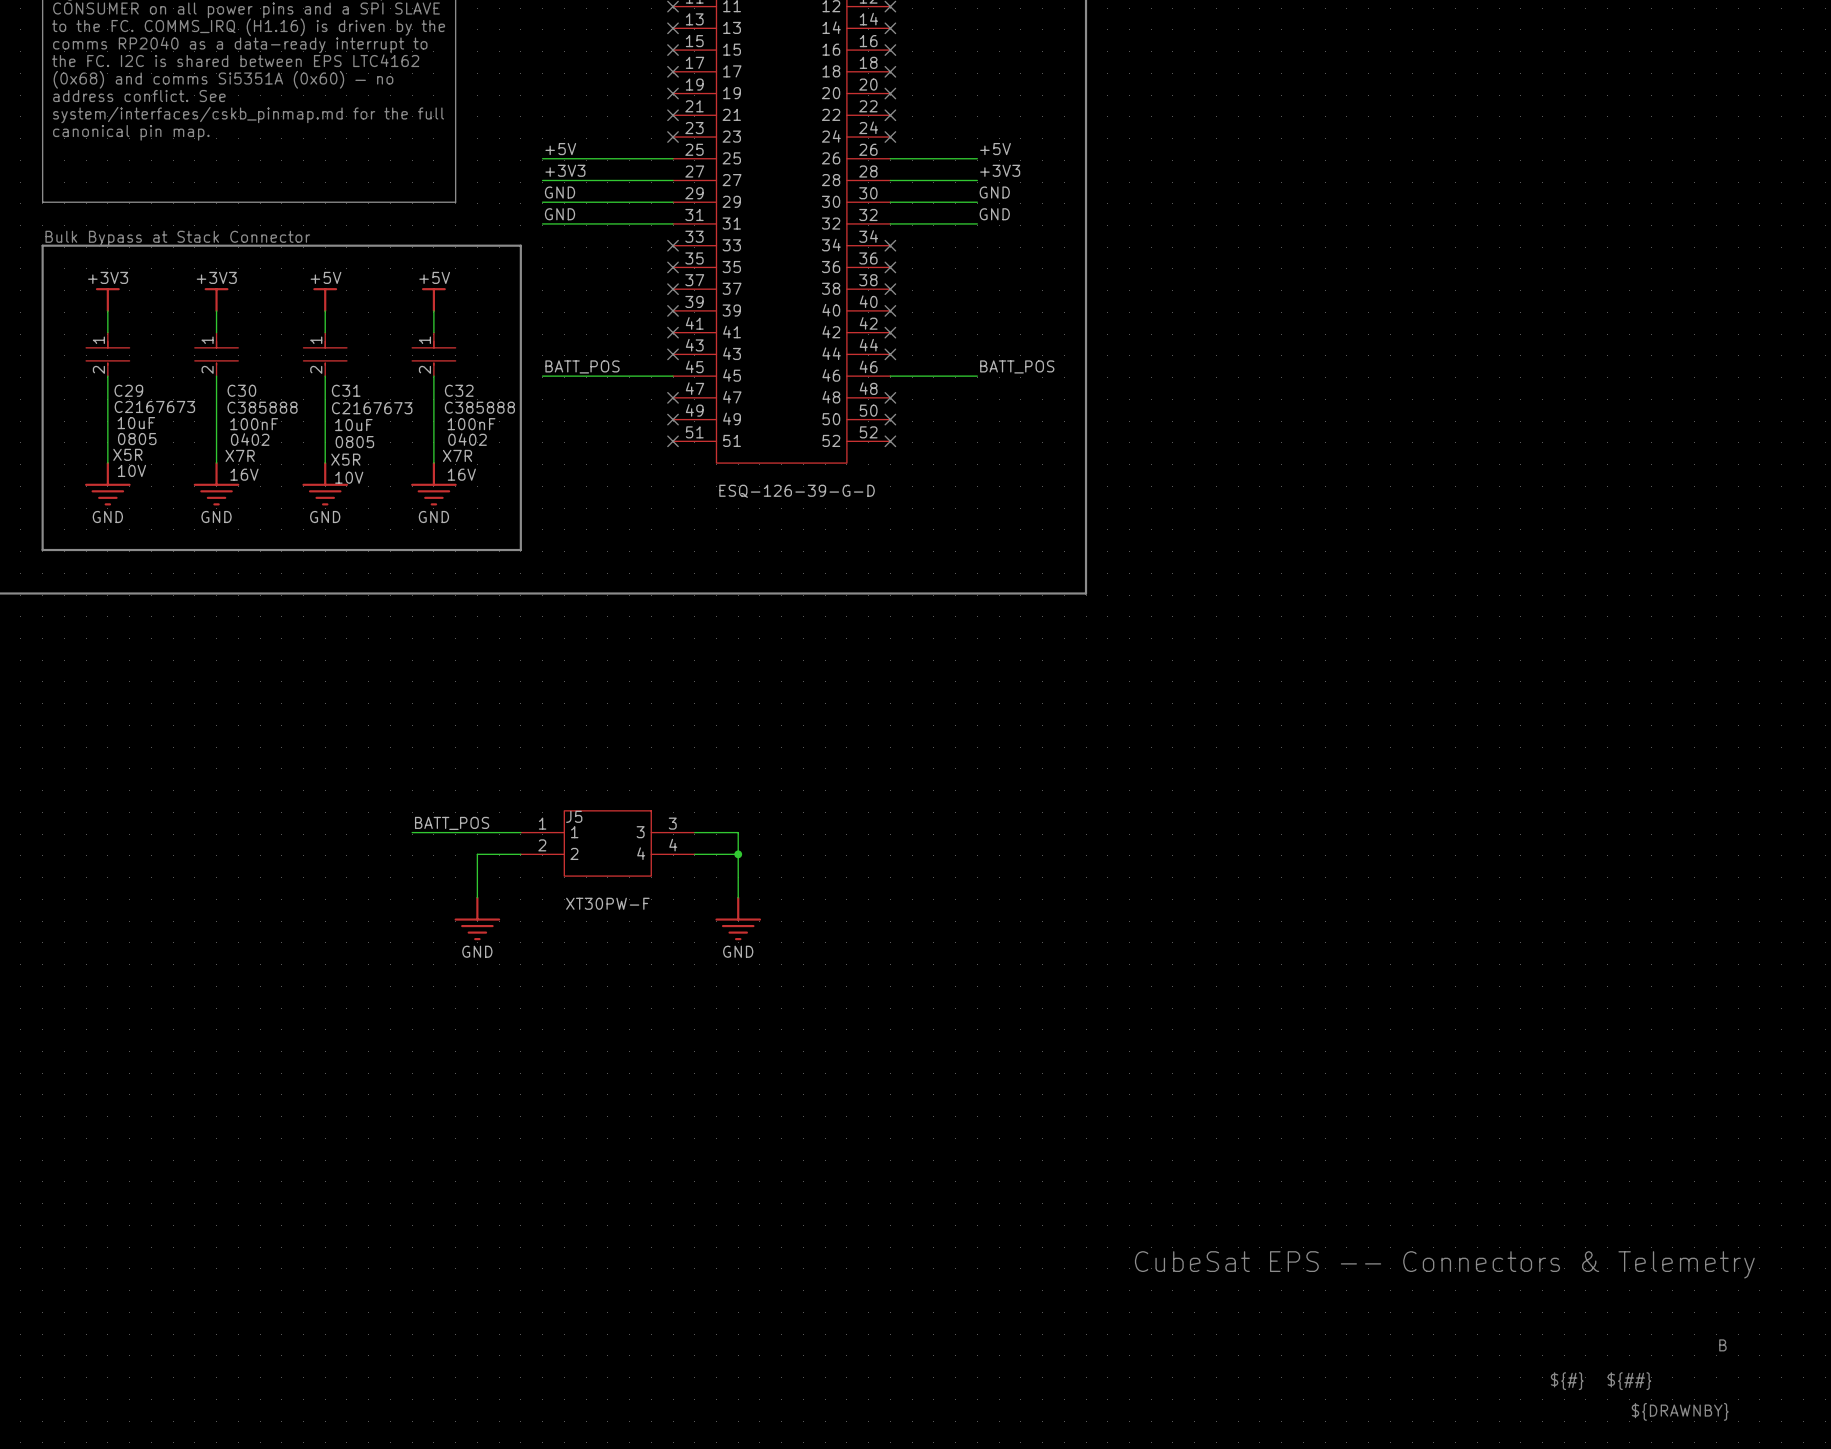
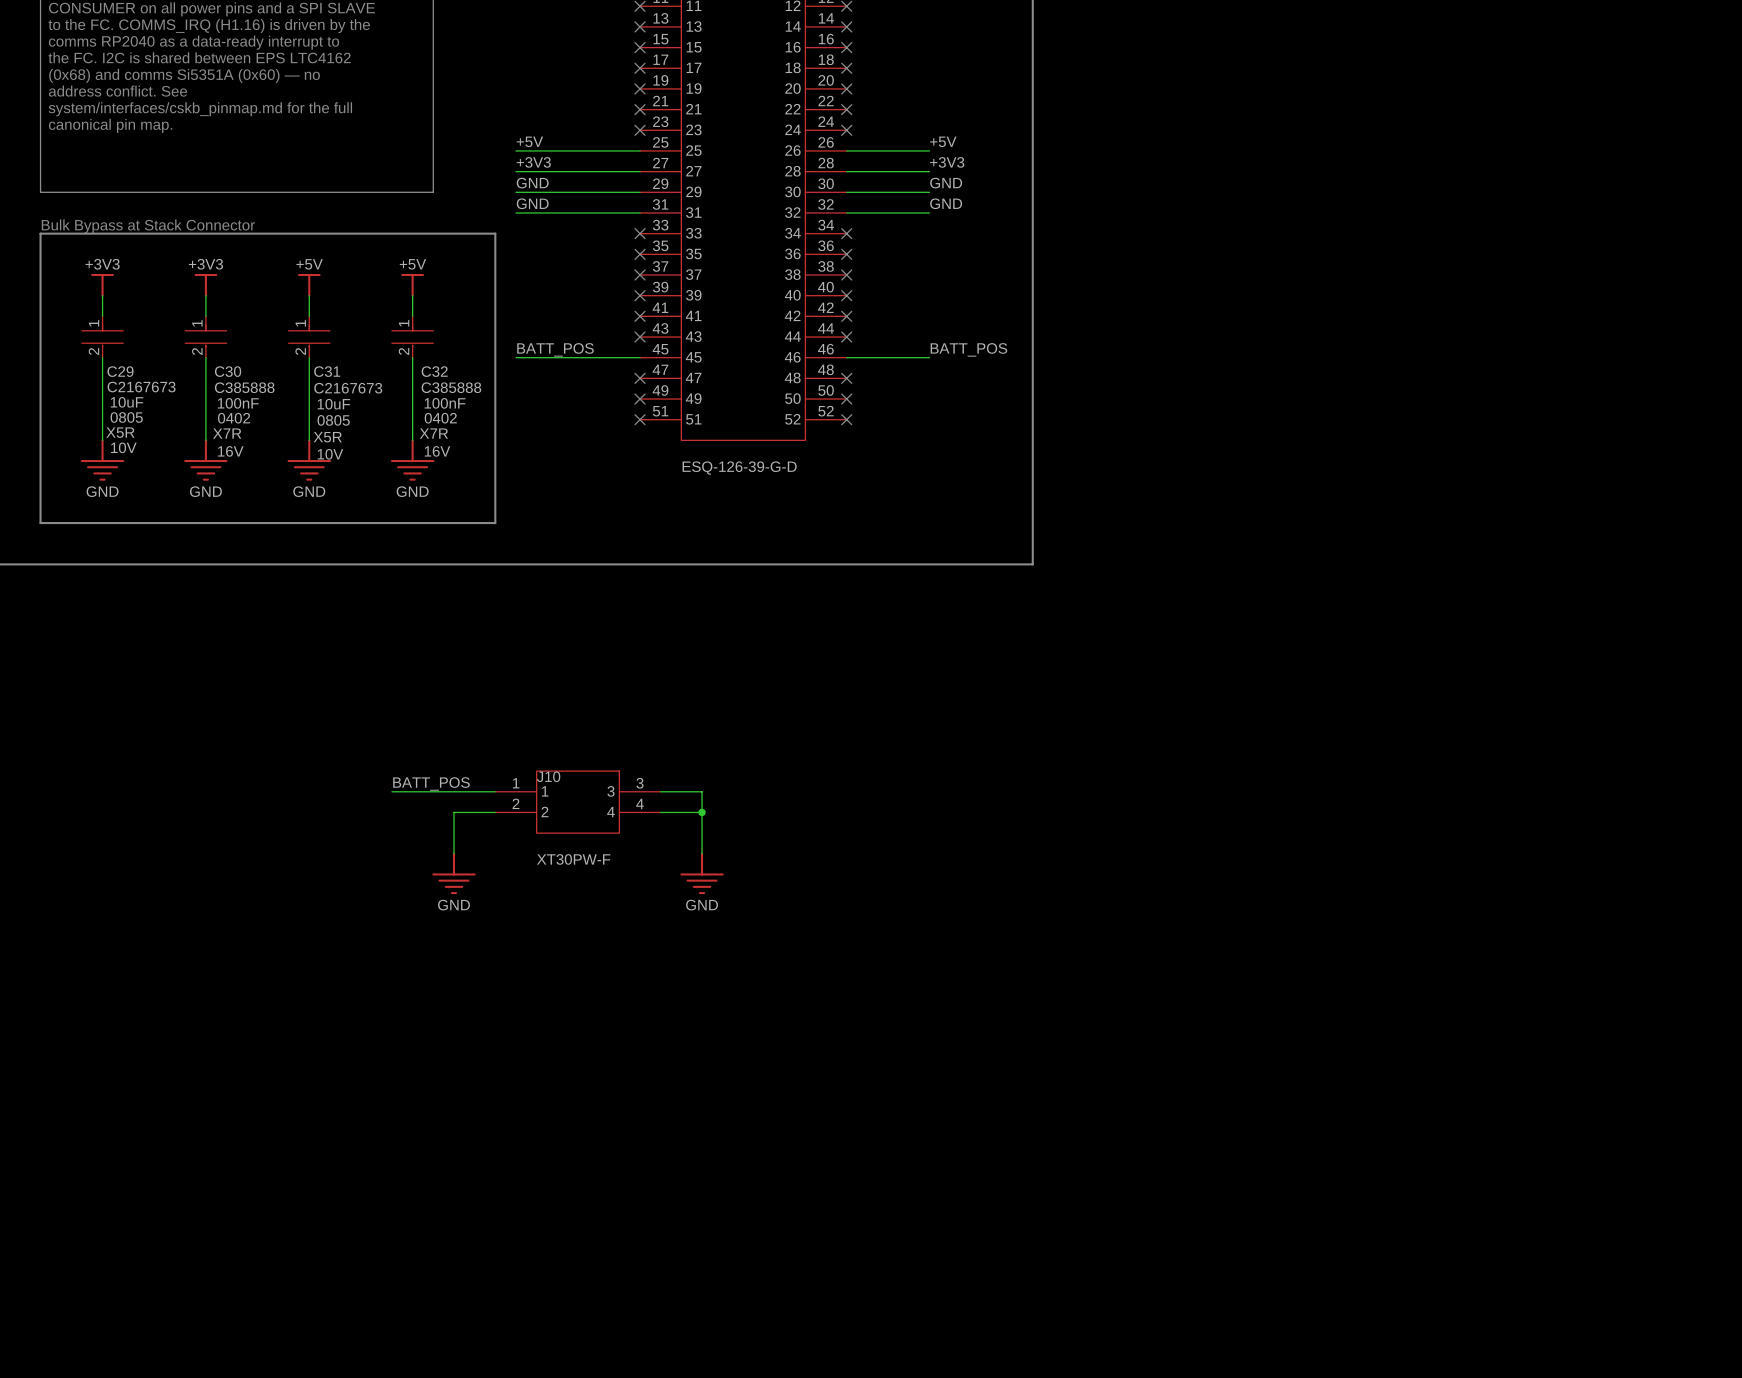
J5 name: J5 (574, 816) -> J10 (548, 776)
text: CubeSat EPS -- Connectors & Telemetry (1444, 1264) -> none
text: B (1722, 1345) -> none
text: ${#} (1567, 1381) -> none
text: ${##} (1629, 1381) -> none
text: ${DRAWNBY} (1680, 1411) -> none

